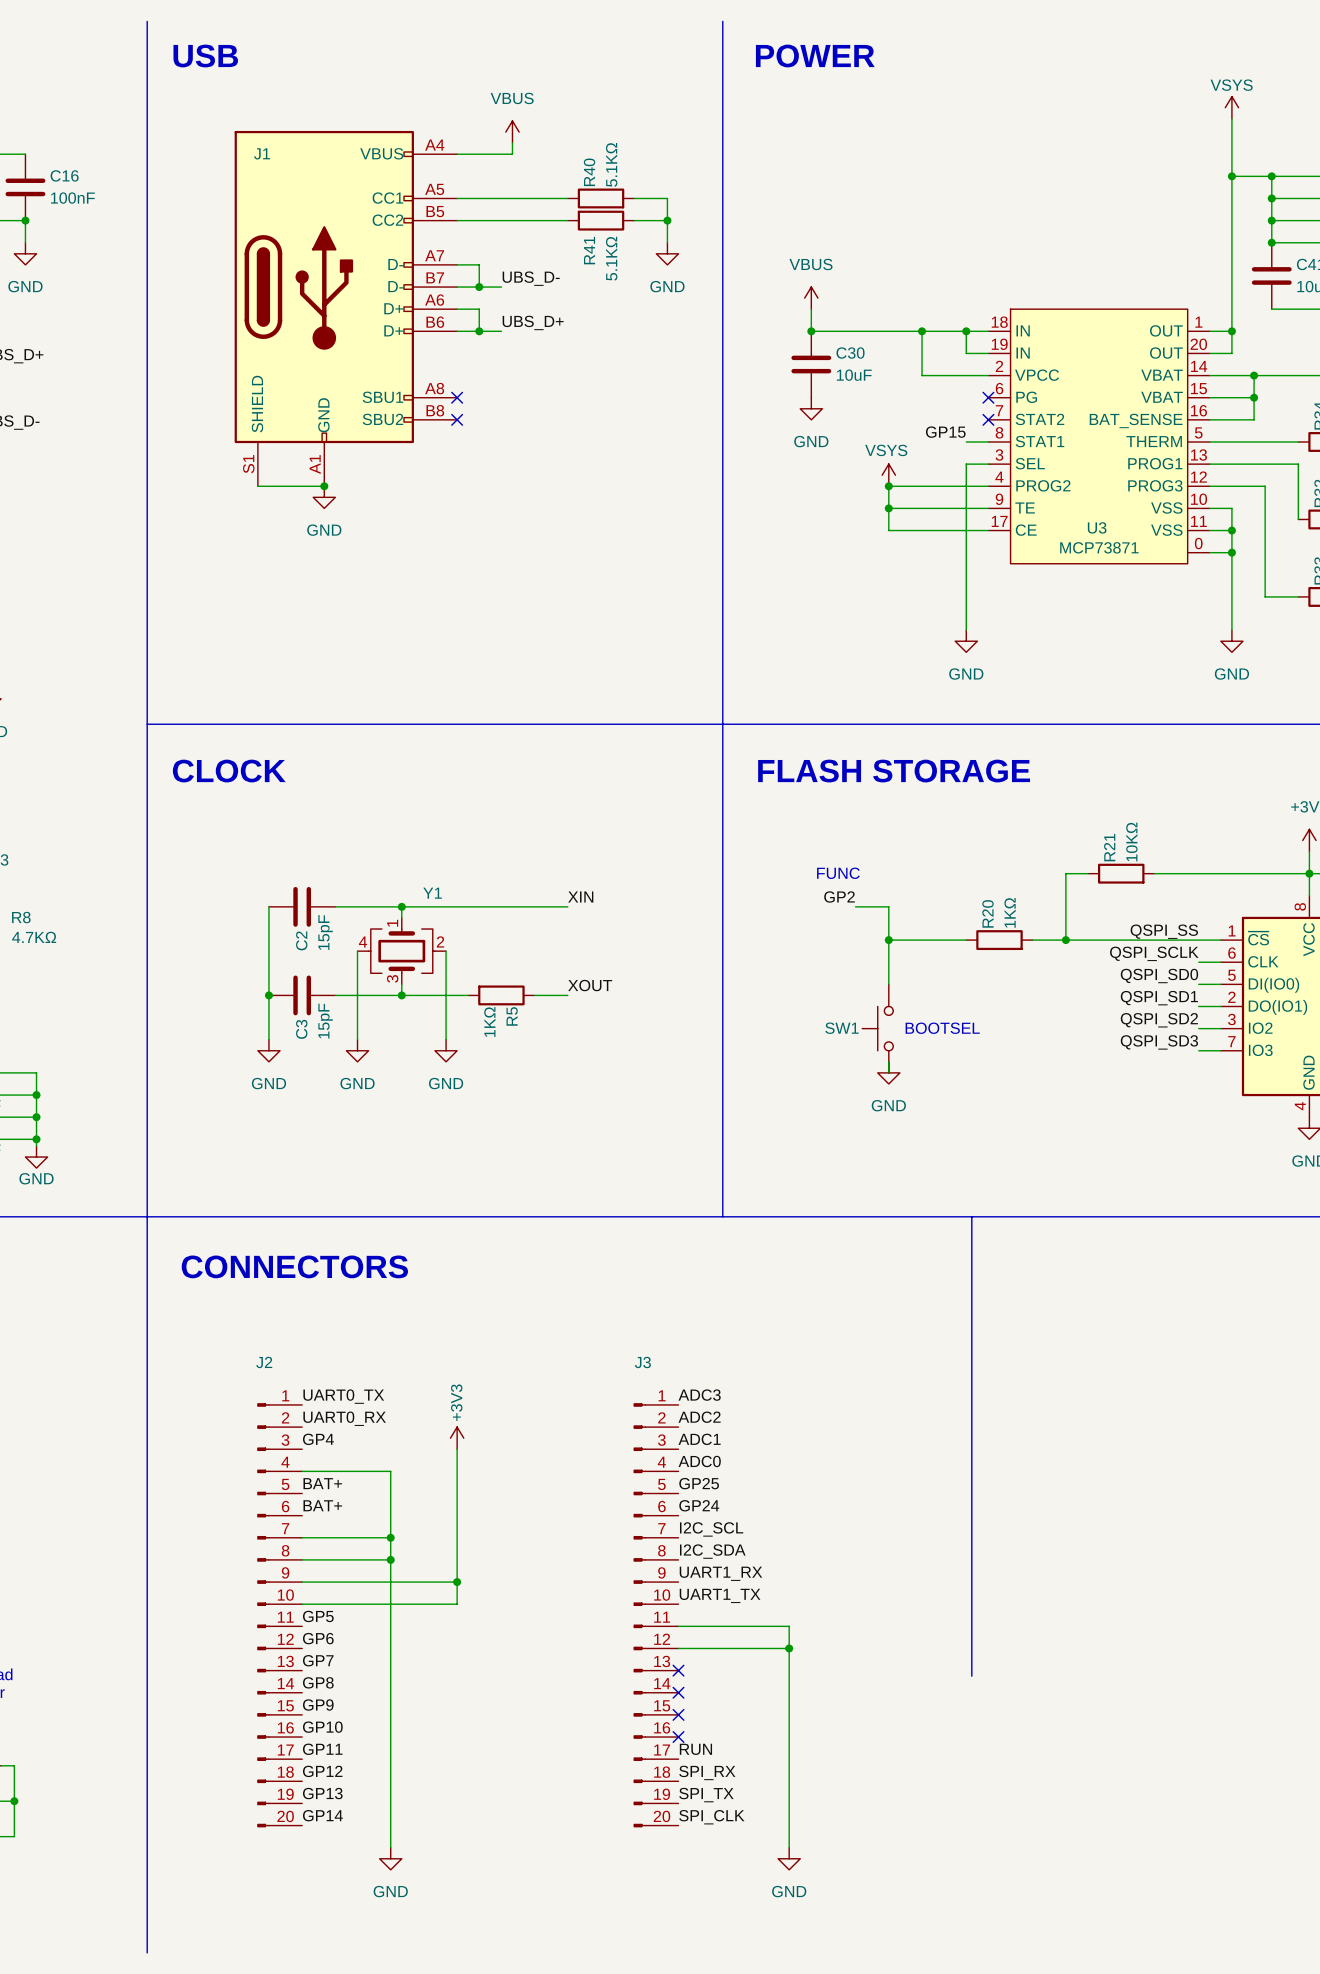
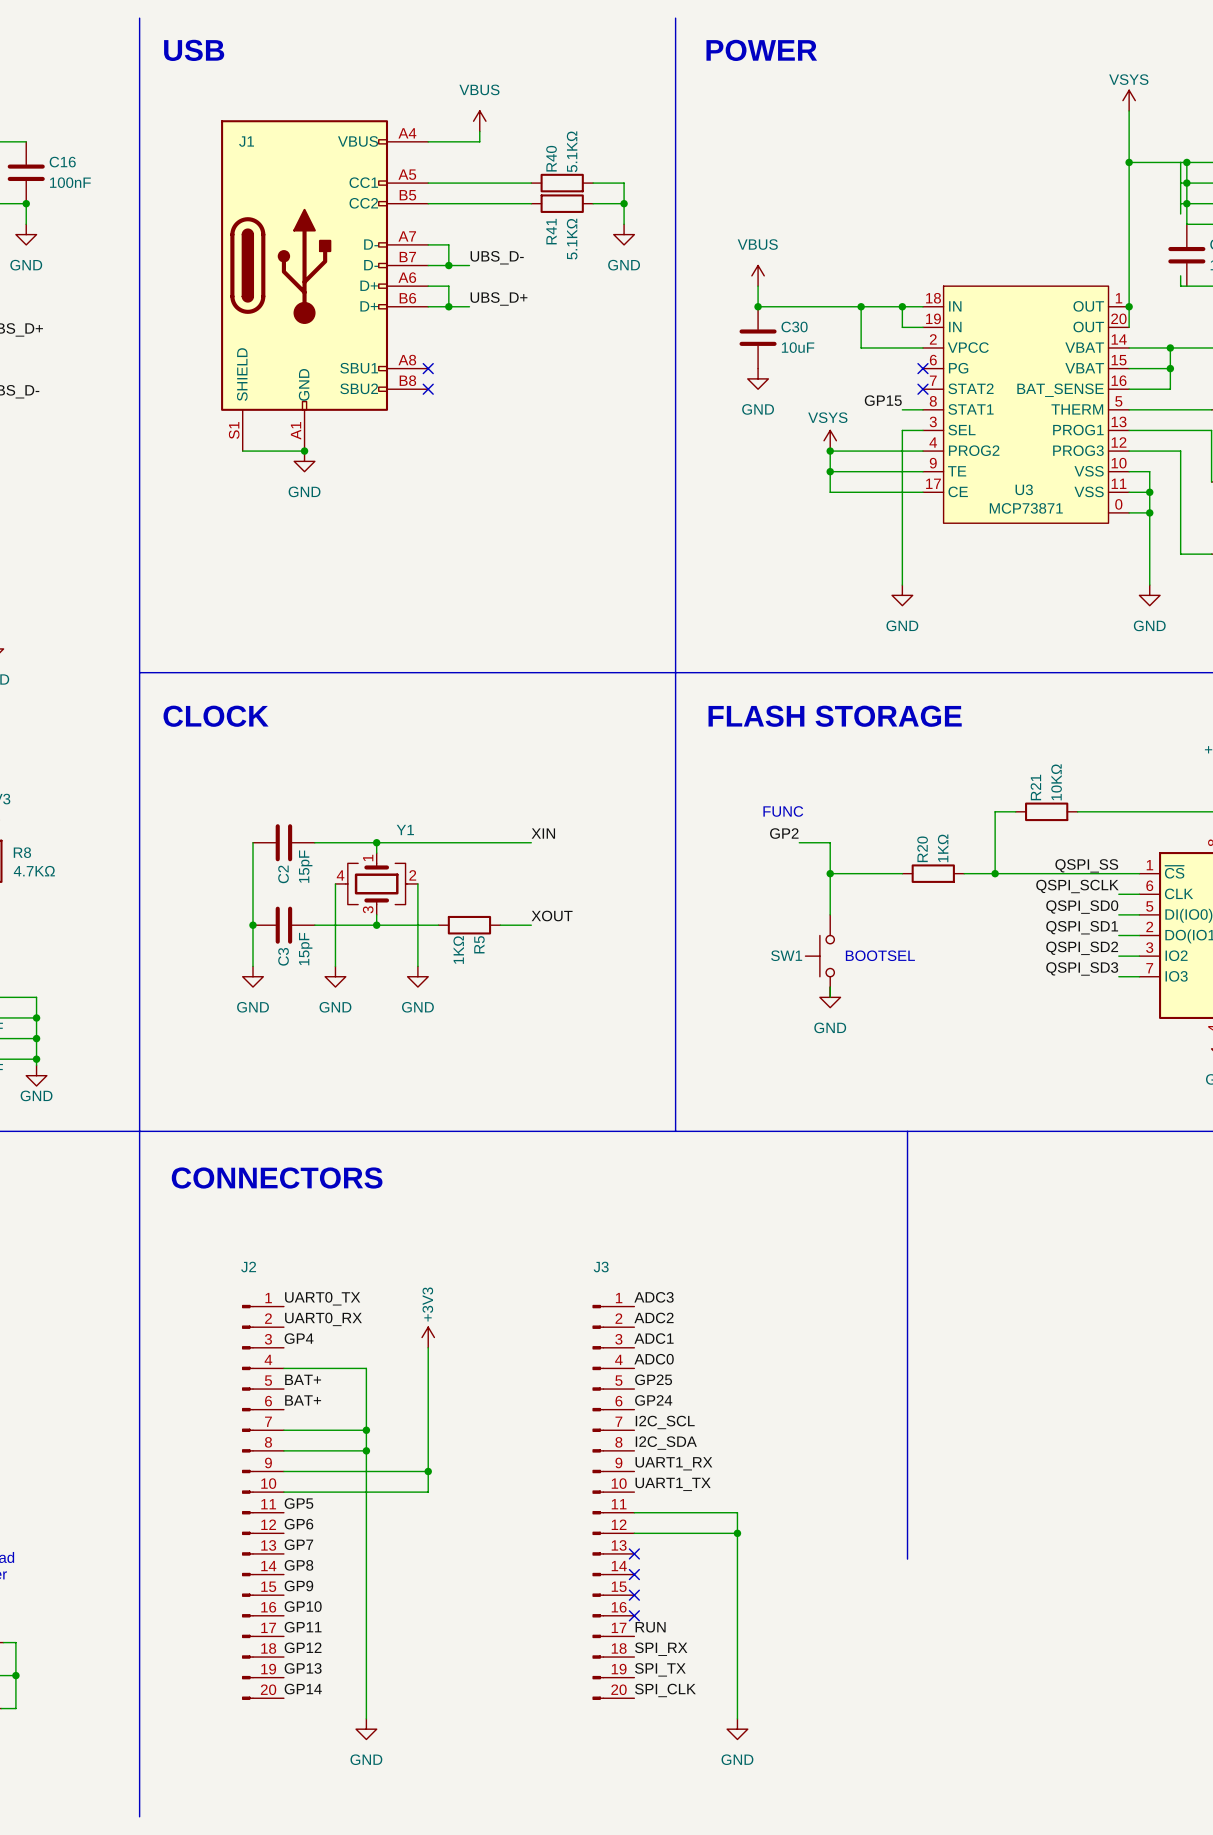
power symbol position: VSYS (1231, 107) -> VSYS (1129, 100)
wire: (1231, 118) (1231, 353) (1209, 353) -> (1129, 110) (1129, 327)
junction position: (1231, 176) -> (1129, 162)
wire: none -> (1180, 162) (1180, 213)
junction: (1271, 242) -> none
wire: none -> (1180, 275) (1180, 286) (1186, 286)
wire: (1209, 331) (1231, 331) -> (1129, 162) (1149, 162)
junction position: (1231, 331) -> (1129, 306)

